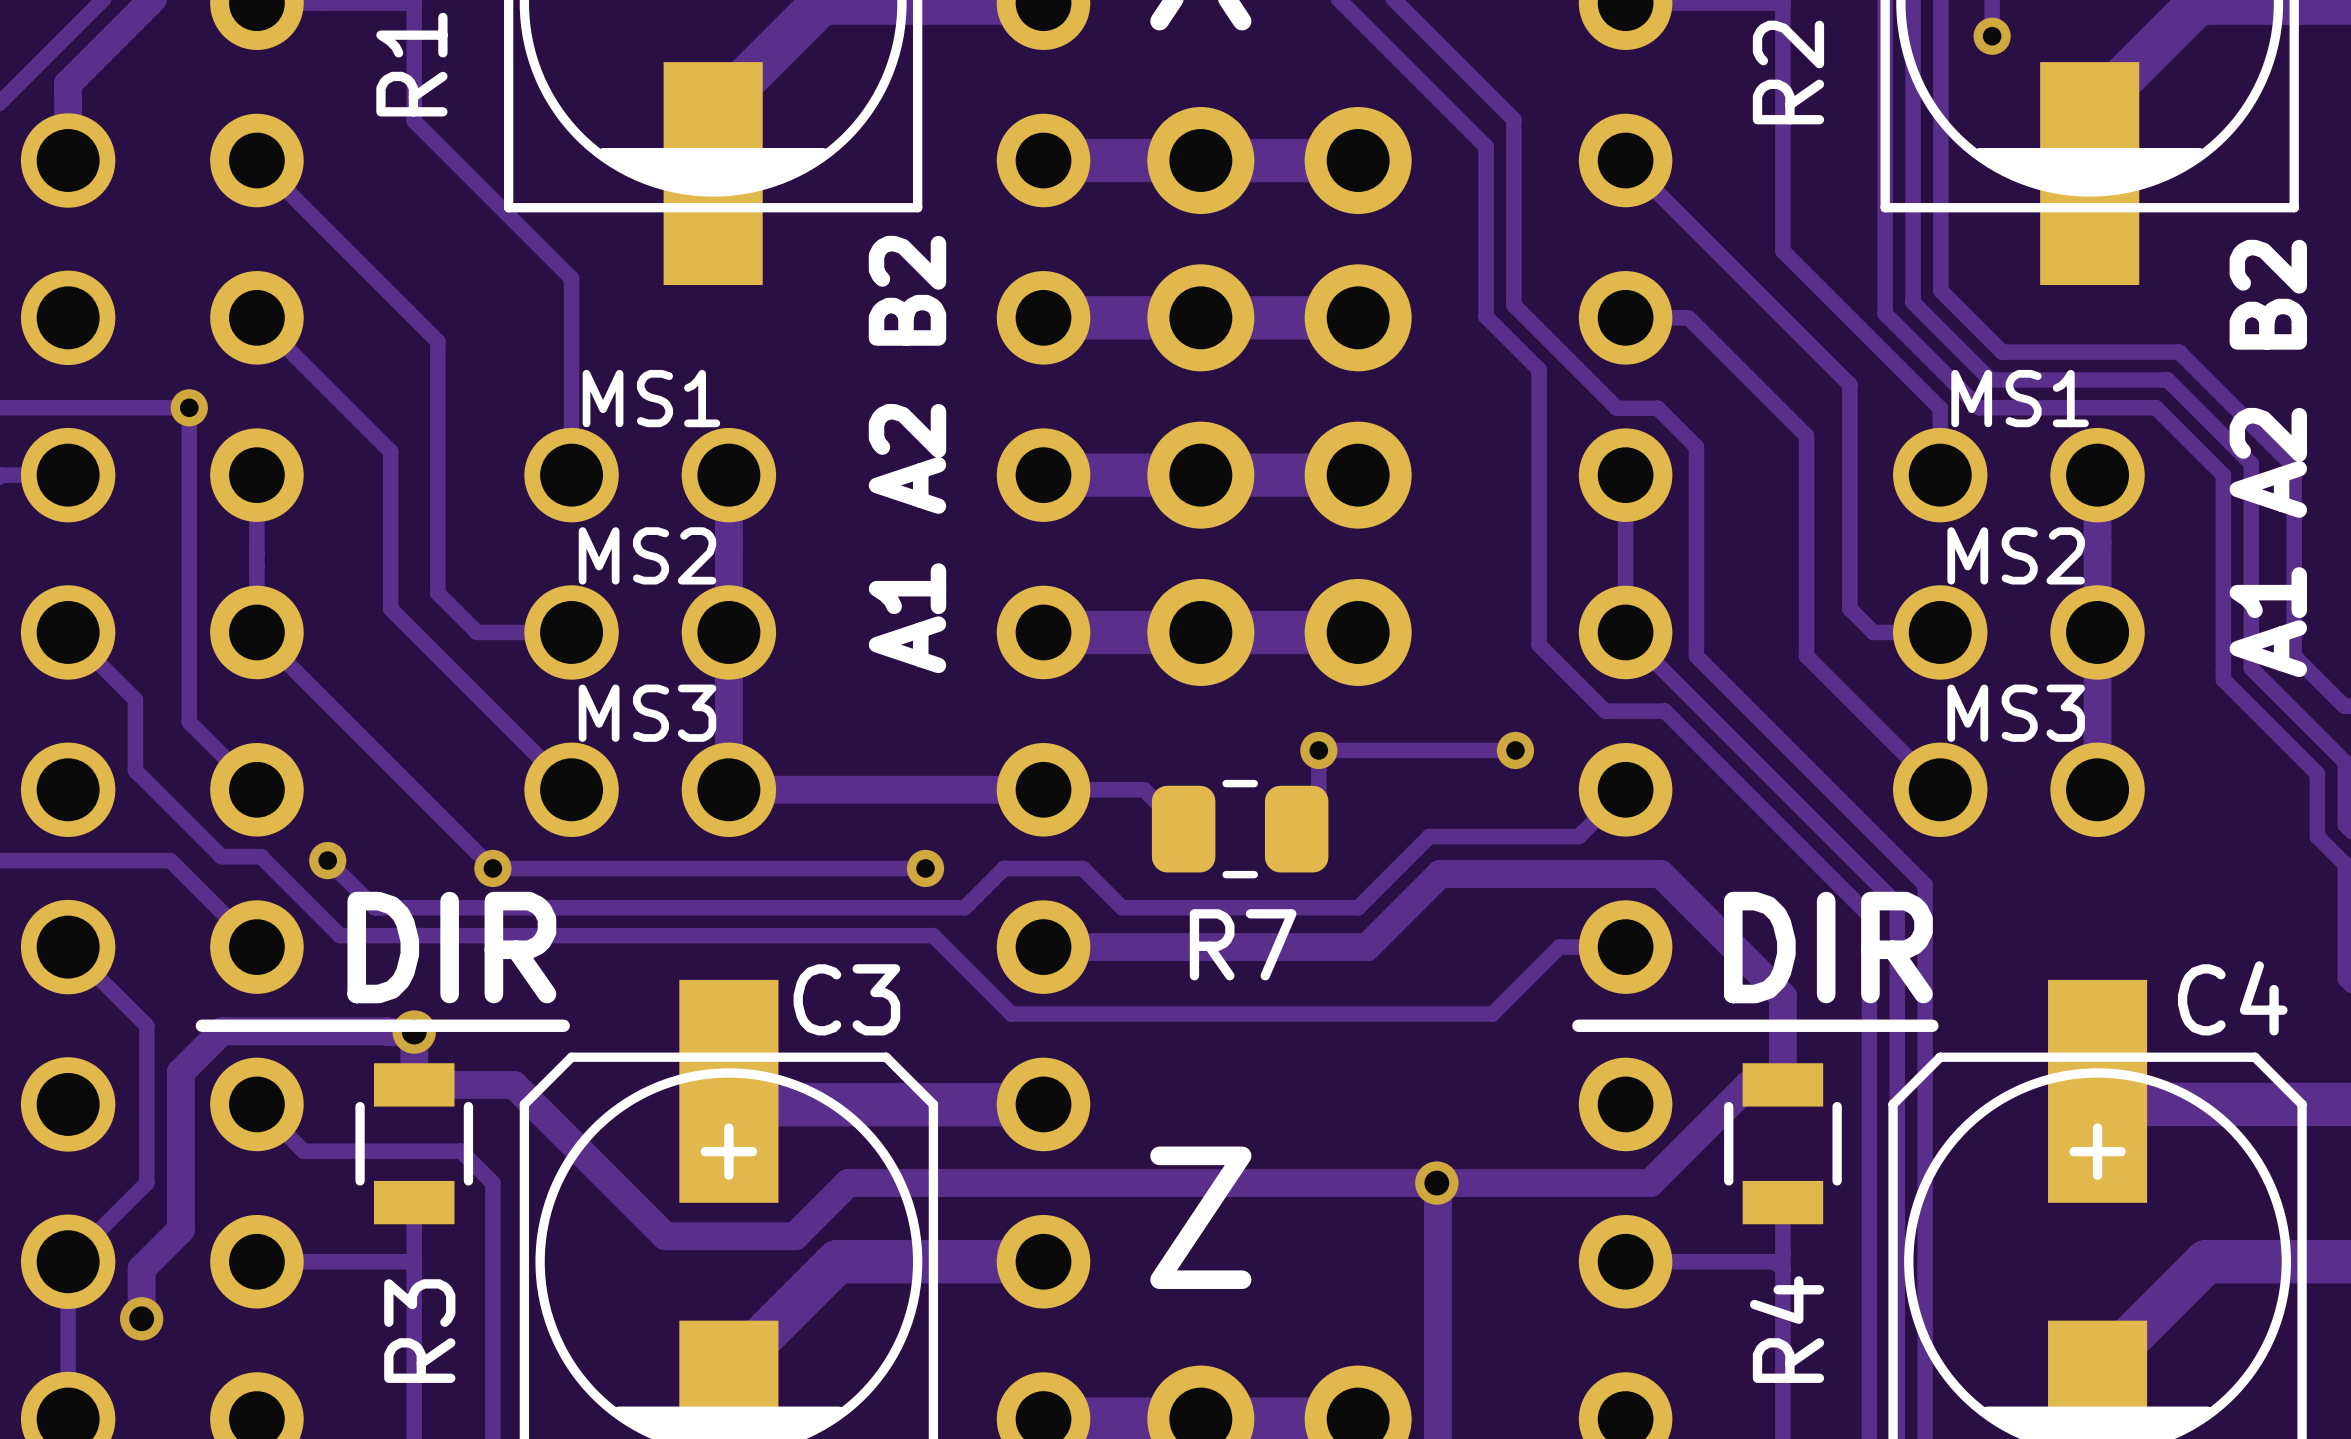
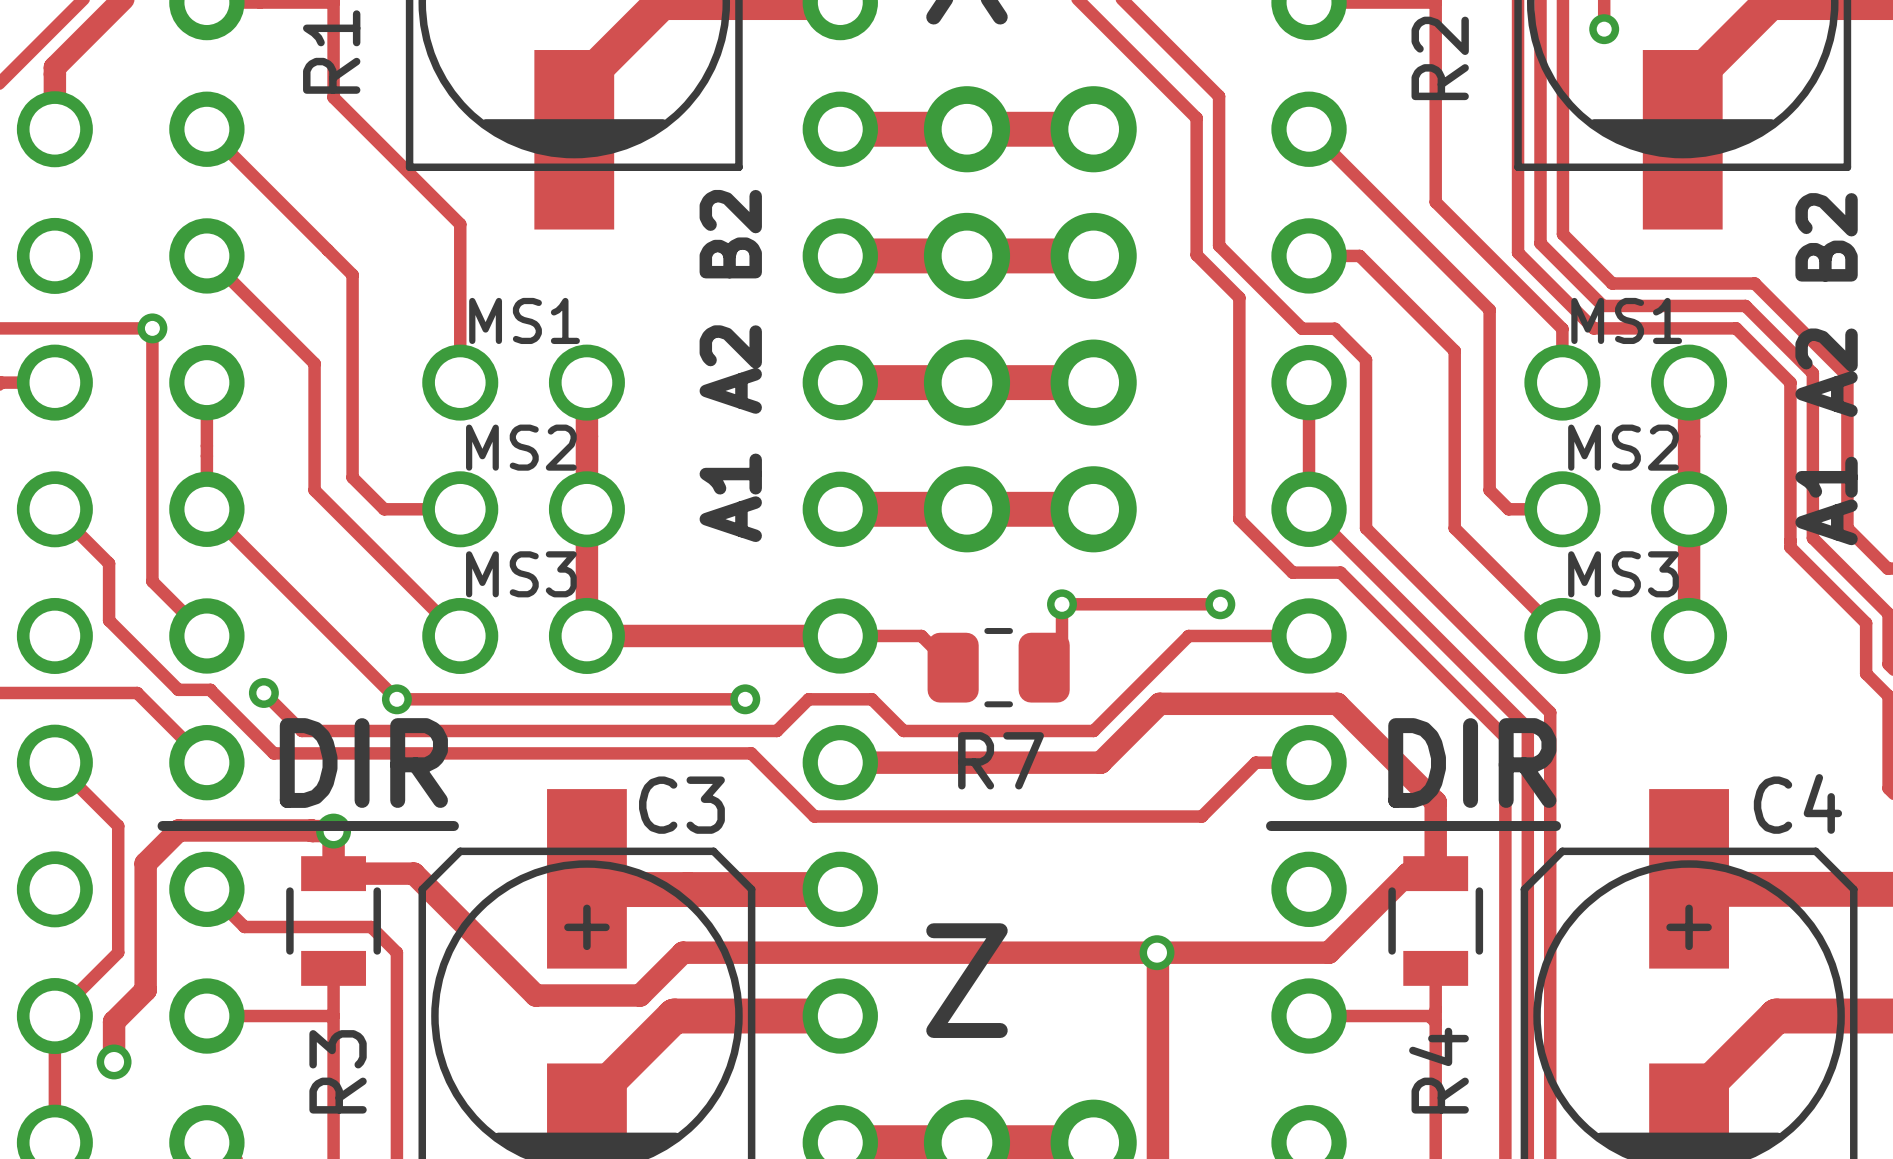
track: (1625, 789) (1578, 836) (1429, 836) -> (1309, 635) (1188, 635) (1151, 673)

